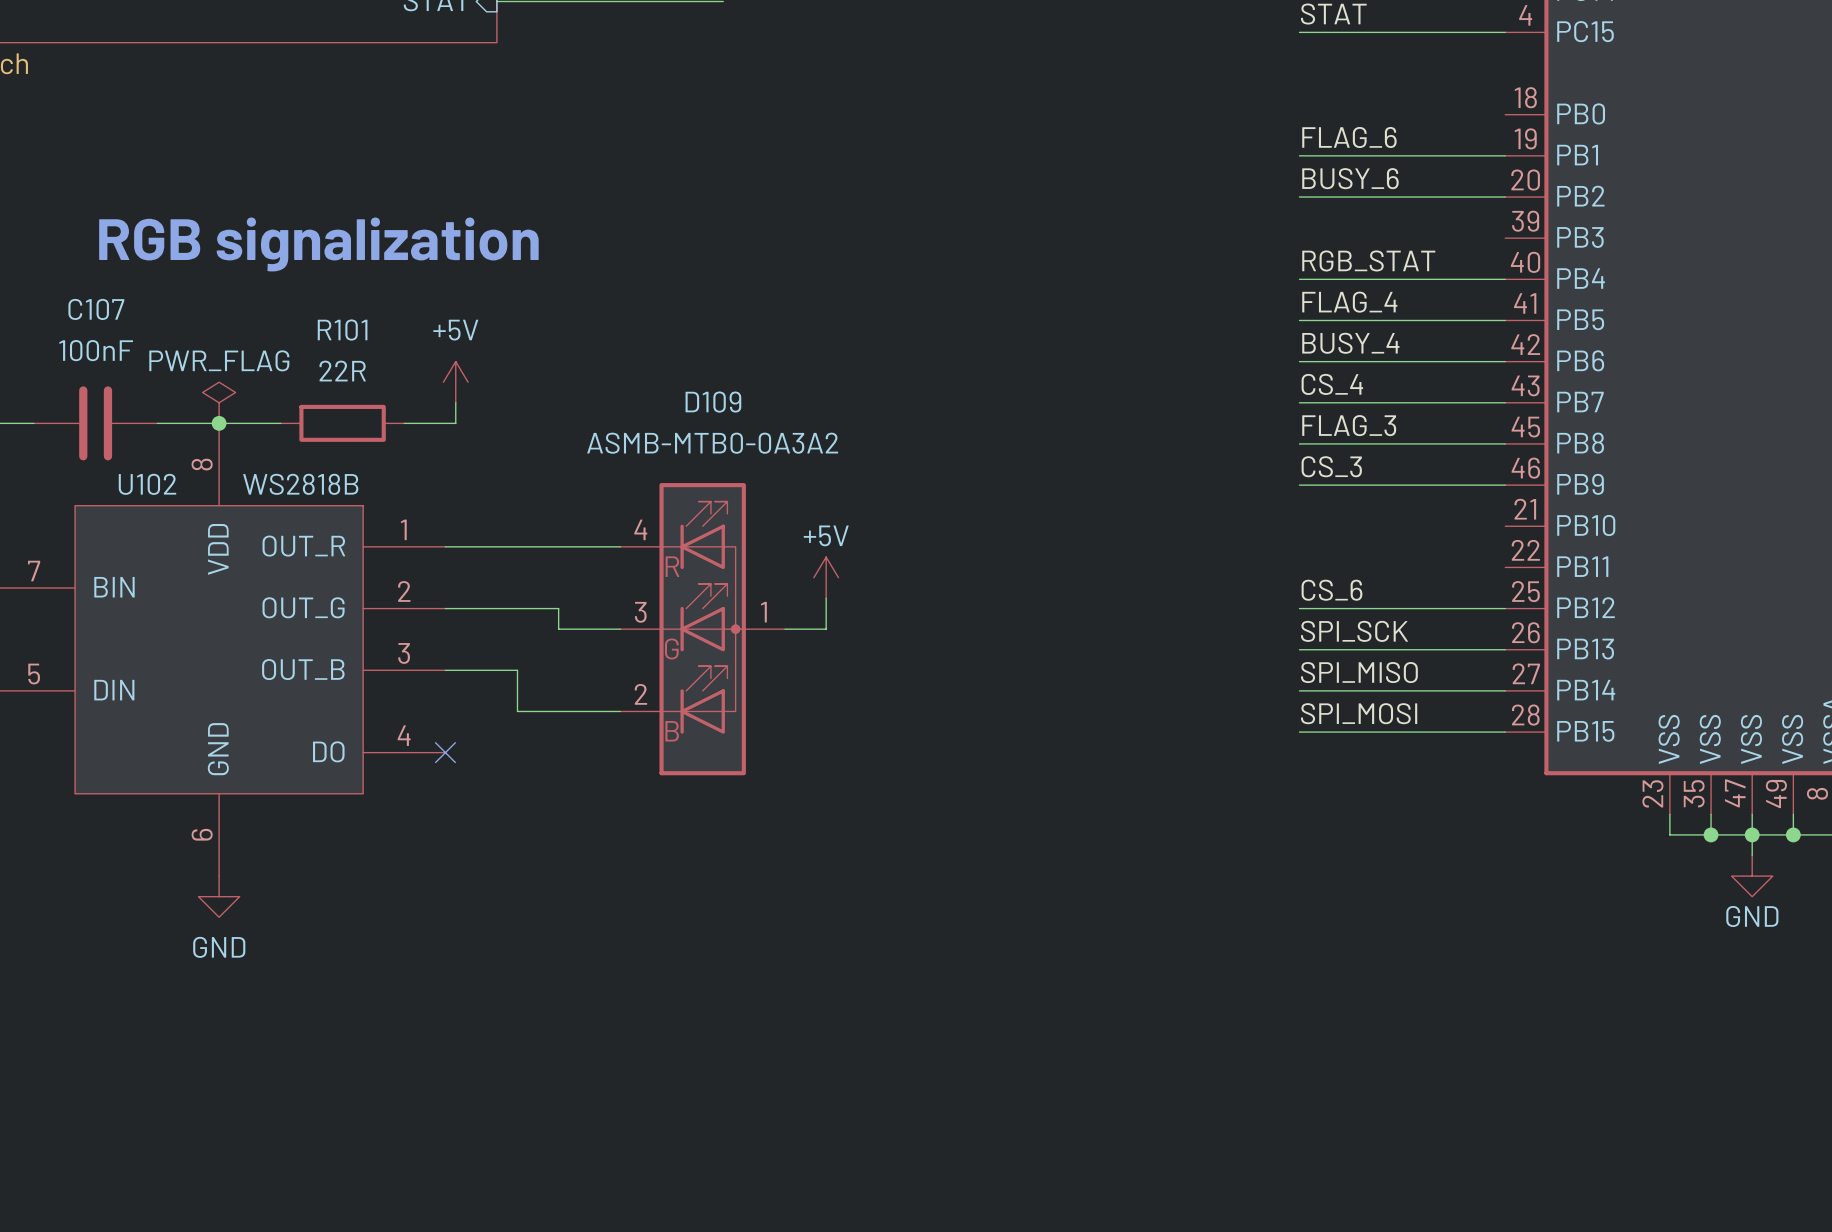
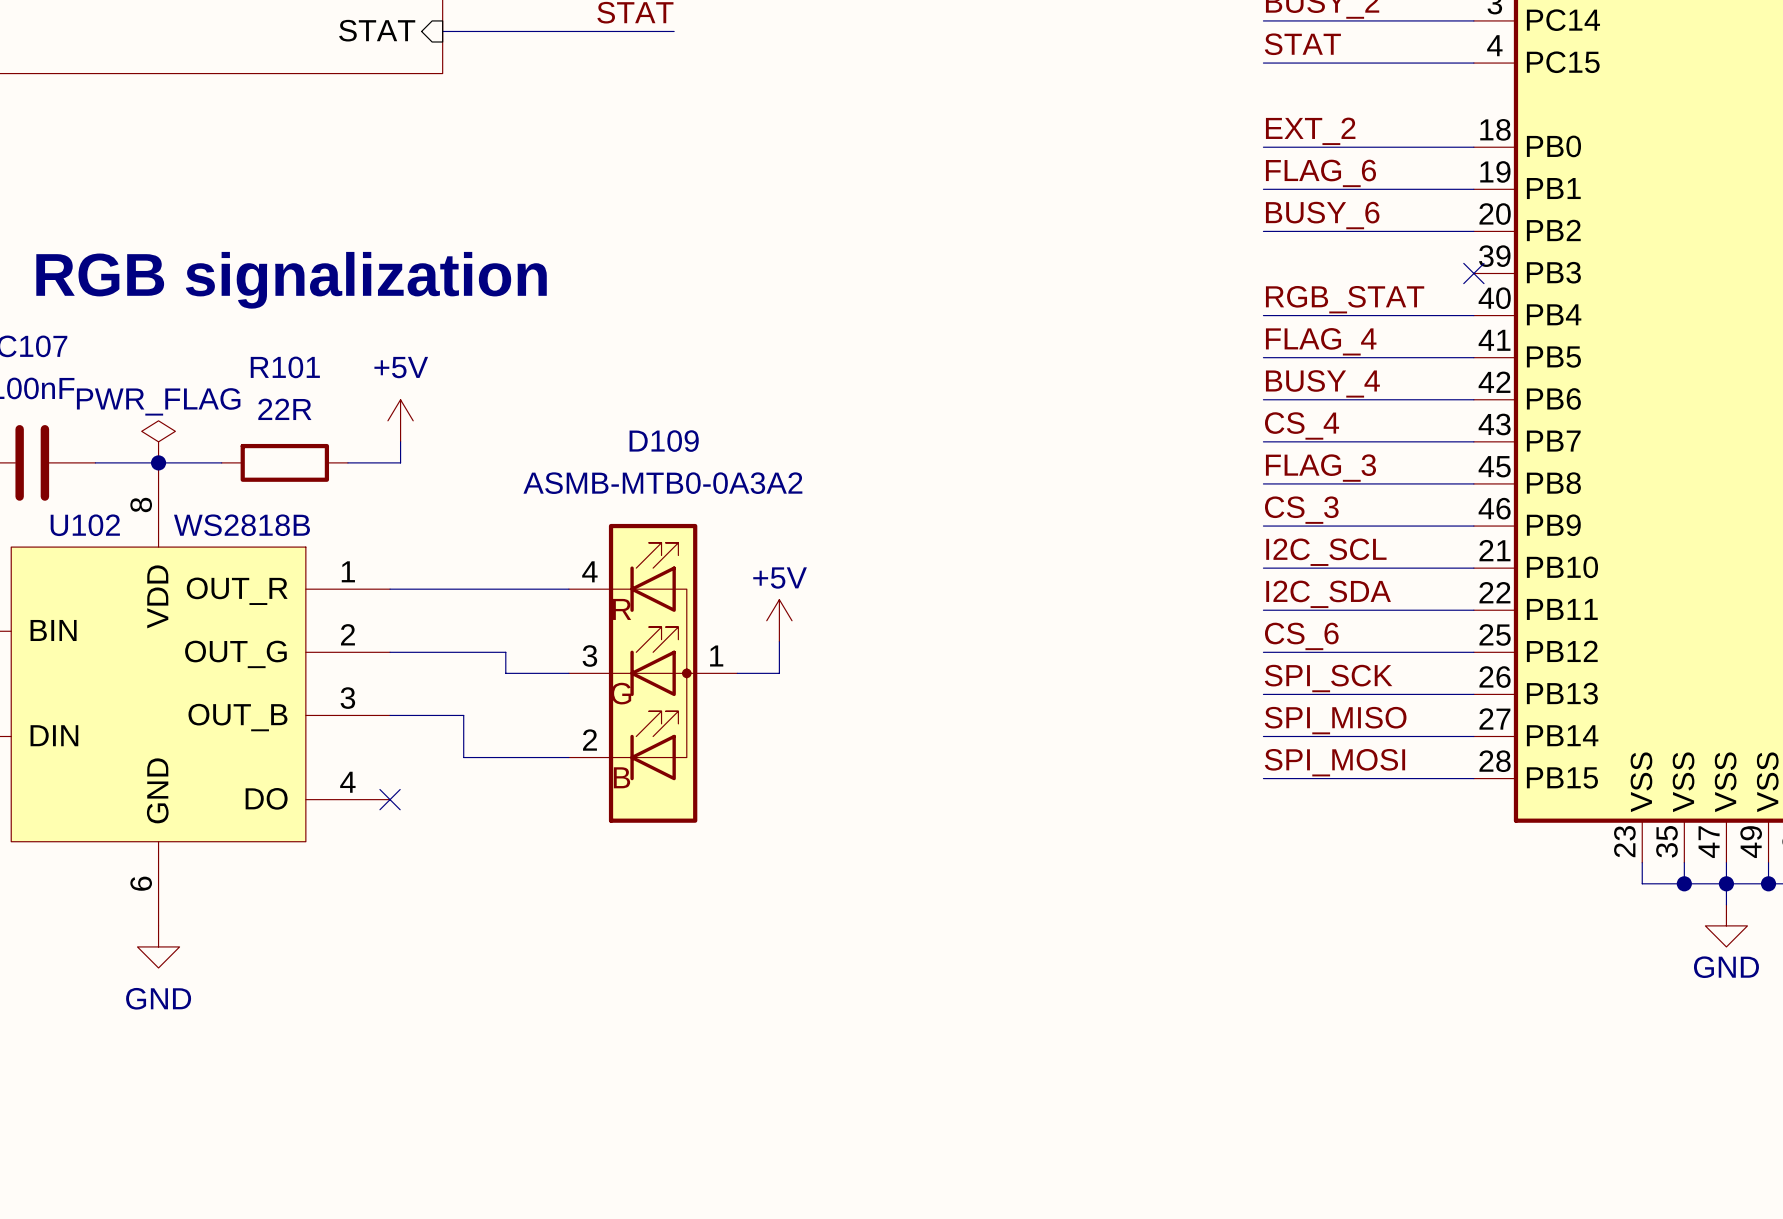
label: none -> EXT_2 (1310, 131)
wire: none -> (1263, 147) (1473, 147)
no-connect mark: none -> (1473, 273)
label: none -> I2C_SCL (1326, 552)
wire: none -> (1263, 568) (1473, 568)
label: none -> I2C_SDA (1328, 594)
wire: none -> (1263, 610) (1473, 610)

